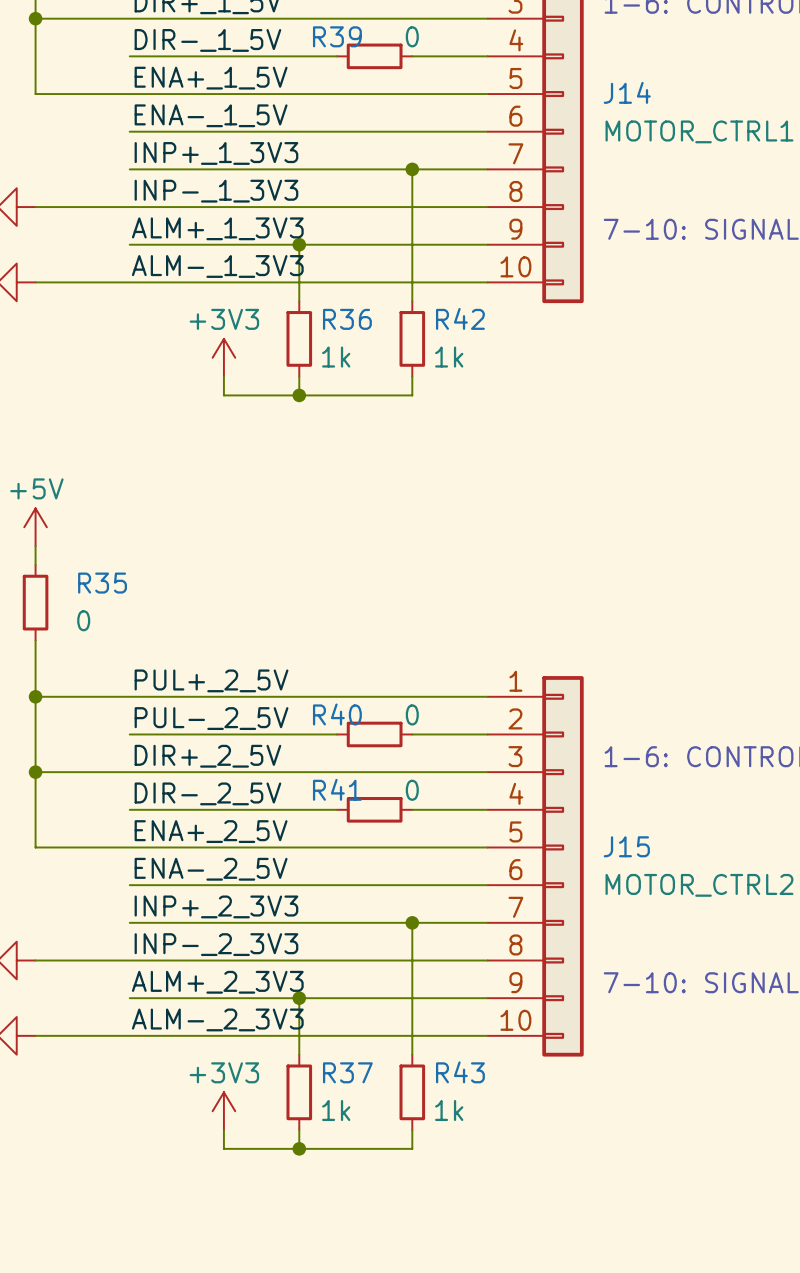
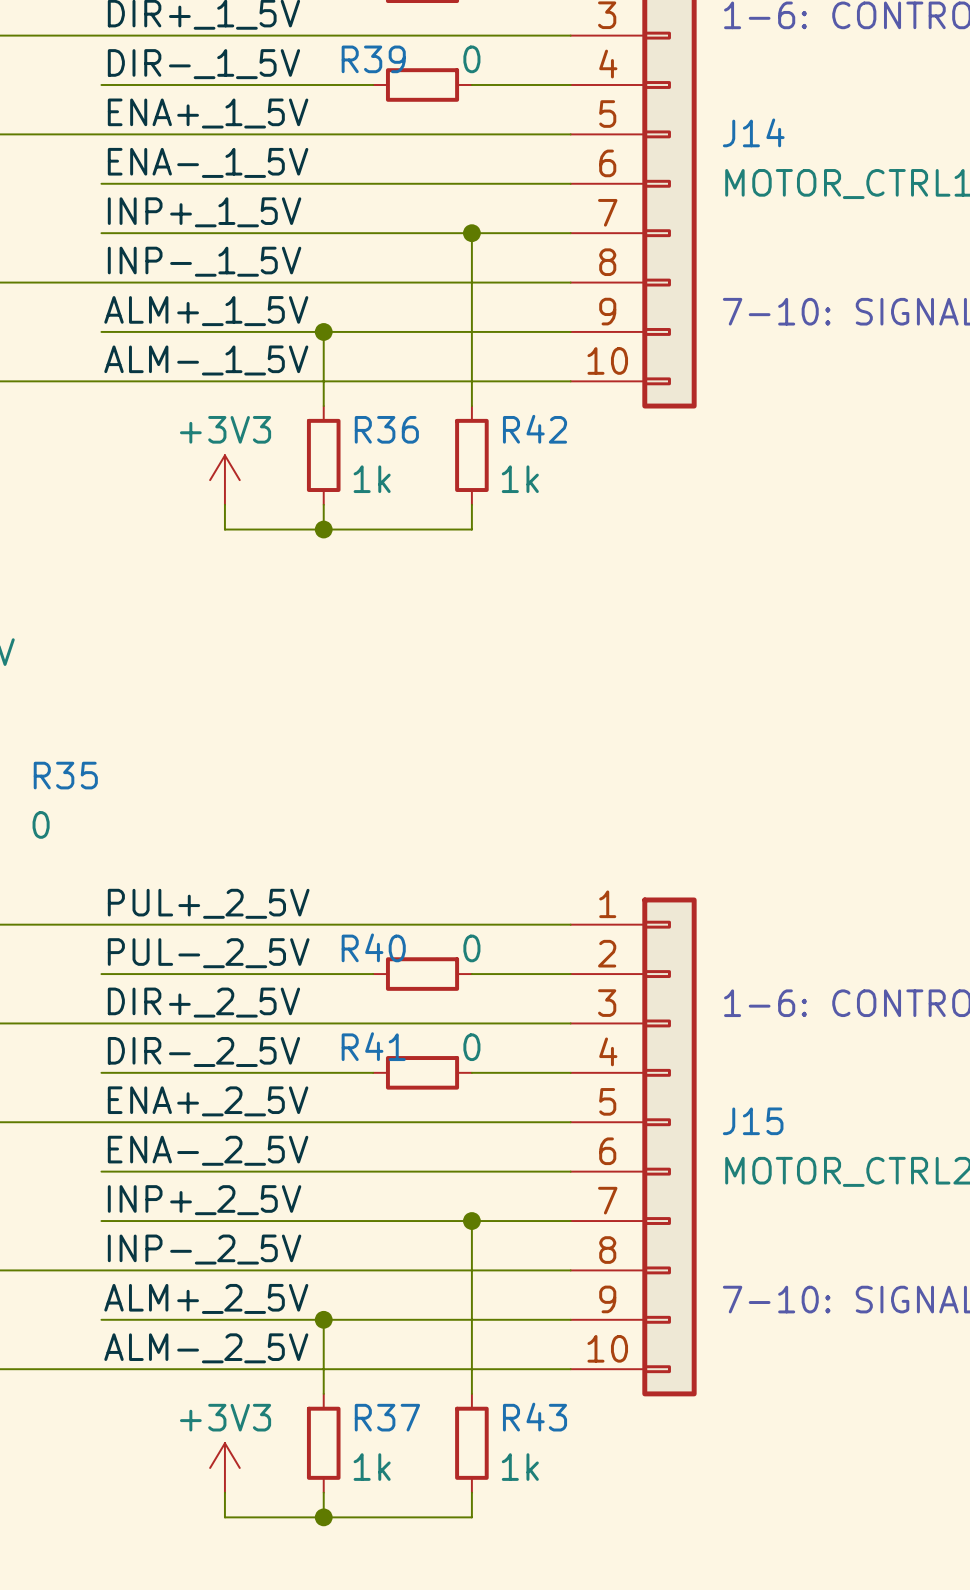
label: INP+_1_3V3 (216, 153) -> INP+_1_5V (204, 212)
label: INP-_1_3V3 (216, 191) -> INP-_1_5V (204, 261)
label: ALM+_1_3V3 (217, 228) -> ALM+_1_5V (206, 311)
label: ALM-_1_3V3 (217, 266) -> ALM-_1_5V (206, 360)
label: INP+_2_3V3 (216, 906) -> INP+_2_5V (204, 1200)
label: INP-_2_3V3 (216, 944) -> INP-_2_5V (204, 1249)
label: ALM+_2_3V3 (217, 982) -> ALM+_2_5V (206, 1298)
label: ALM-_2_3V3 (217, 1019) -> ALM-_2_5V (206, 1348)

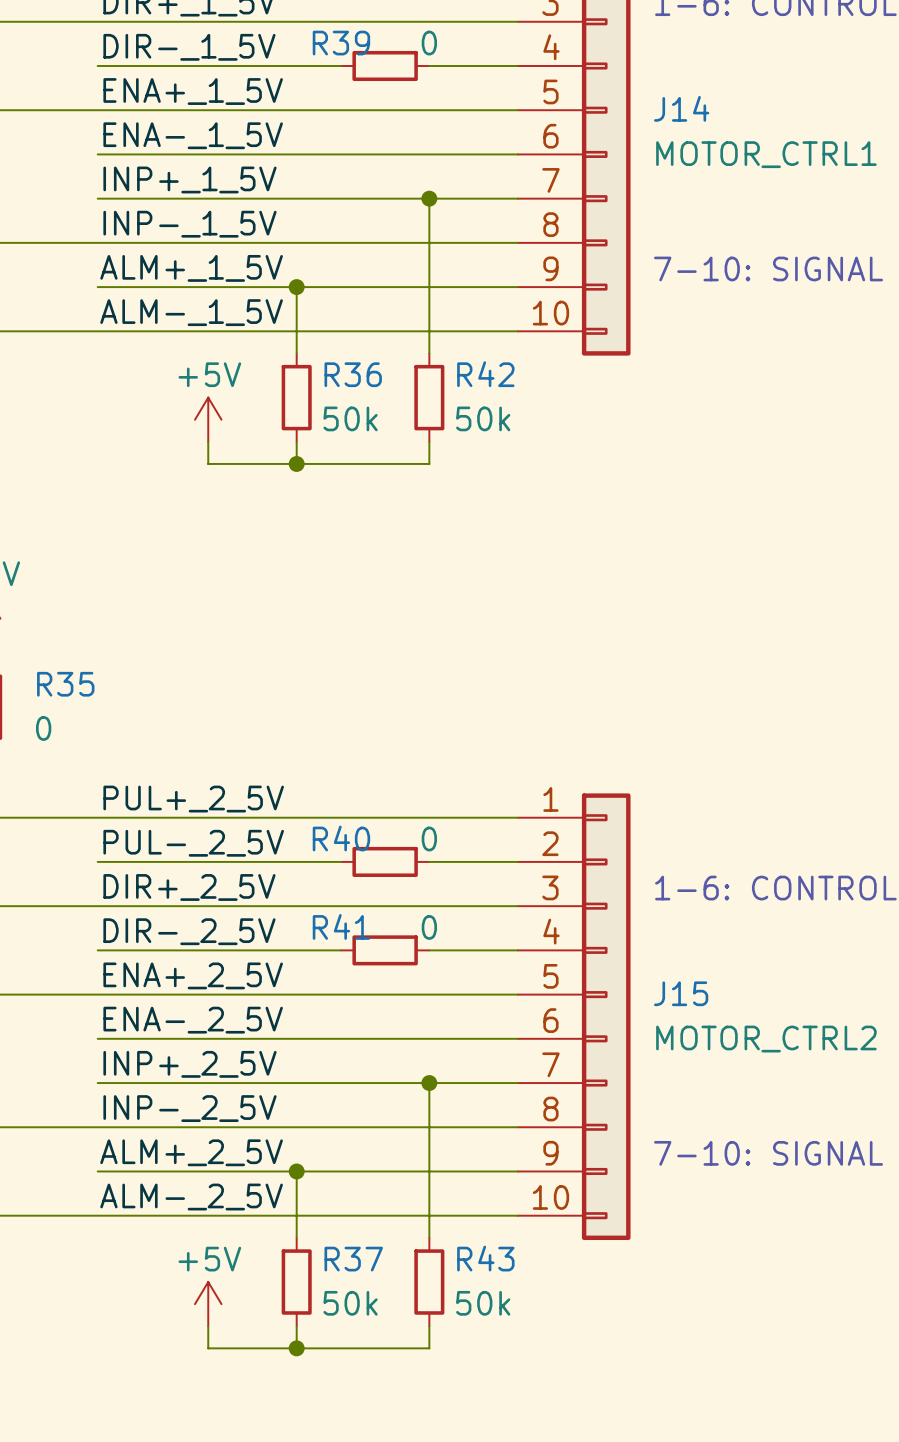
R36 value: 1k (372, 479) -> 50k (350, 418)
R42 value: 1k (520, 479) -> 50k (483, 418)
power symbol: +3V3 (224, 480) -> +5V (208, 419)
power symbol: +3V3 (224, 1467) -> +5V (208, 1304)
R37 value: 1k (372, 1467) -> 50k (350, 1303)
R43 value: 1k (520, 1467) -> 50k (483, 1303)

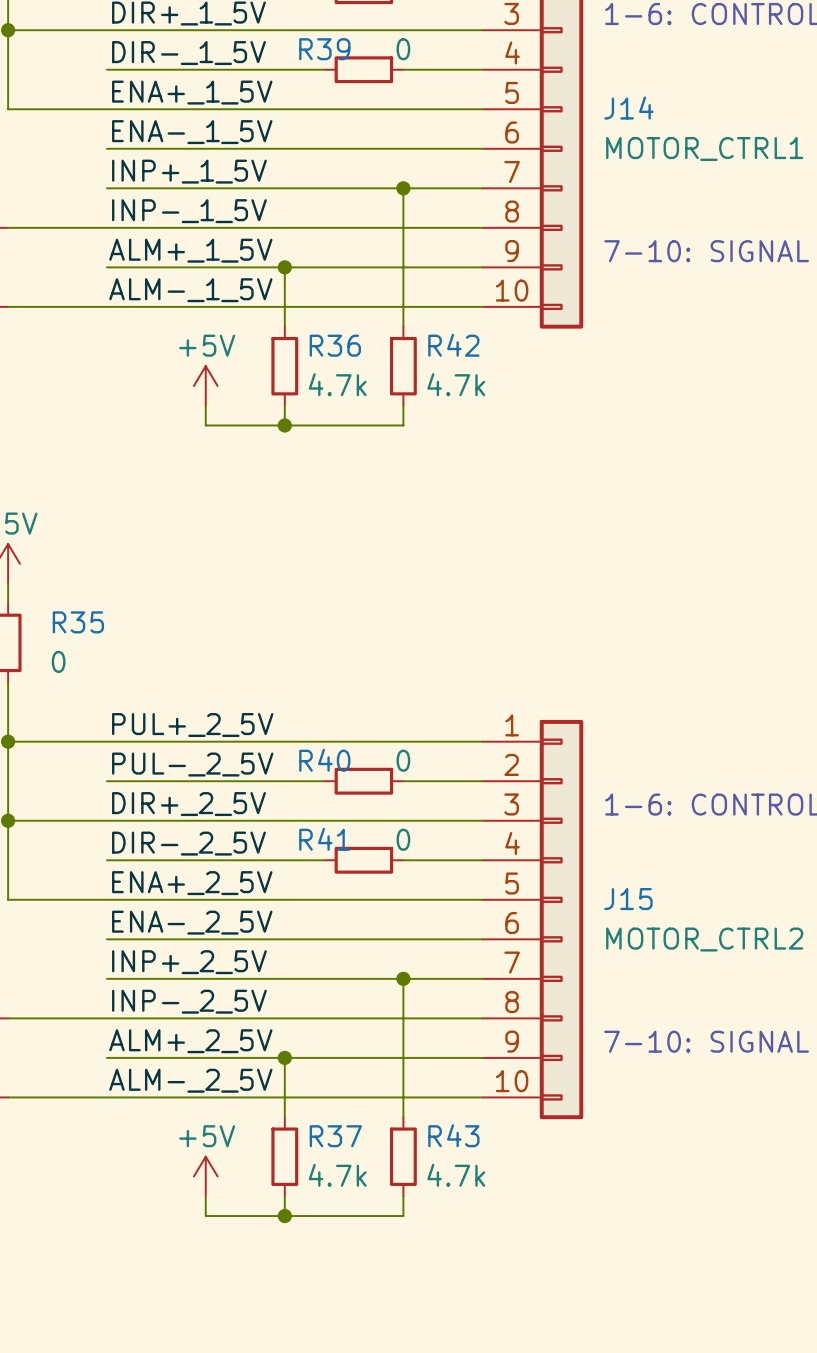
R36 value: 50k (350, 418) -> 4.7k (337, 384)
R42 value: 50k (483, 418) -> 4.7k (456, 384)
R37 value: 50k (350, 1303) -> 4.7k (337, 1175)
R43 value: 50k (483, 1303) -> 4.7k (456, 1175)

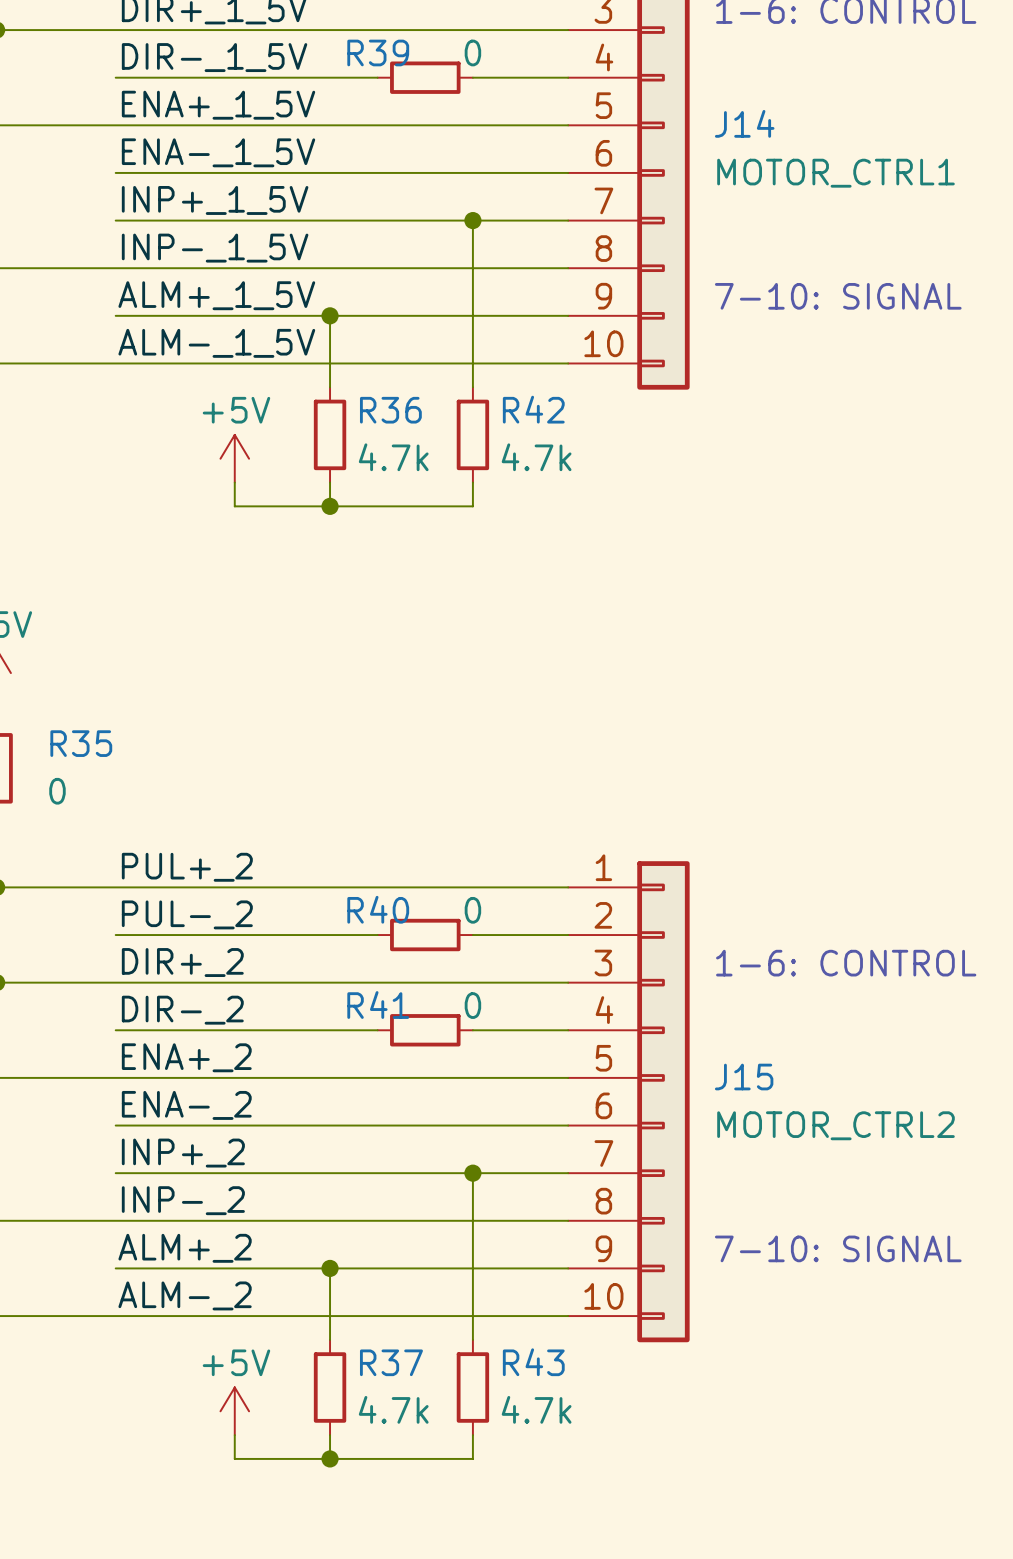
label: PUL+_2_5V (192, 725) -> PUL+_2 (187, 867)
label: PUL-_2_5V (192, 764) -> PUL-_2 (187, 914)
label: DIR+_2_5V (188, 804) -> DIR+_2 (182, 962)
label: DIR-_2_5V (188, 843) -> DIR-_2 (182, 1010)
label: ENA+_2_5V (192, 883) -> ENA+_2 (186, 1057)
label: ENA-_2_5V (192, 922) -> ENA-_2 (186, 1105)
label: INP+_2_5V (189, 962) -> INP+_2 (183, 1153)
label: INP-_2_5V (189, 1001) -> INP-_2 (183, 1200)
label: ALM+_2_5V (190, 1041) -> ALM+_2 (185, 1248)
label: ALM-_2_5V (190, 1080) -> ALM-_2 (185, 1295)

